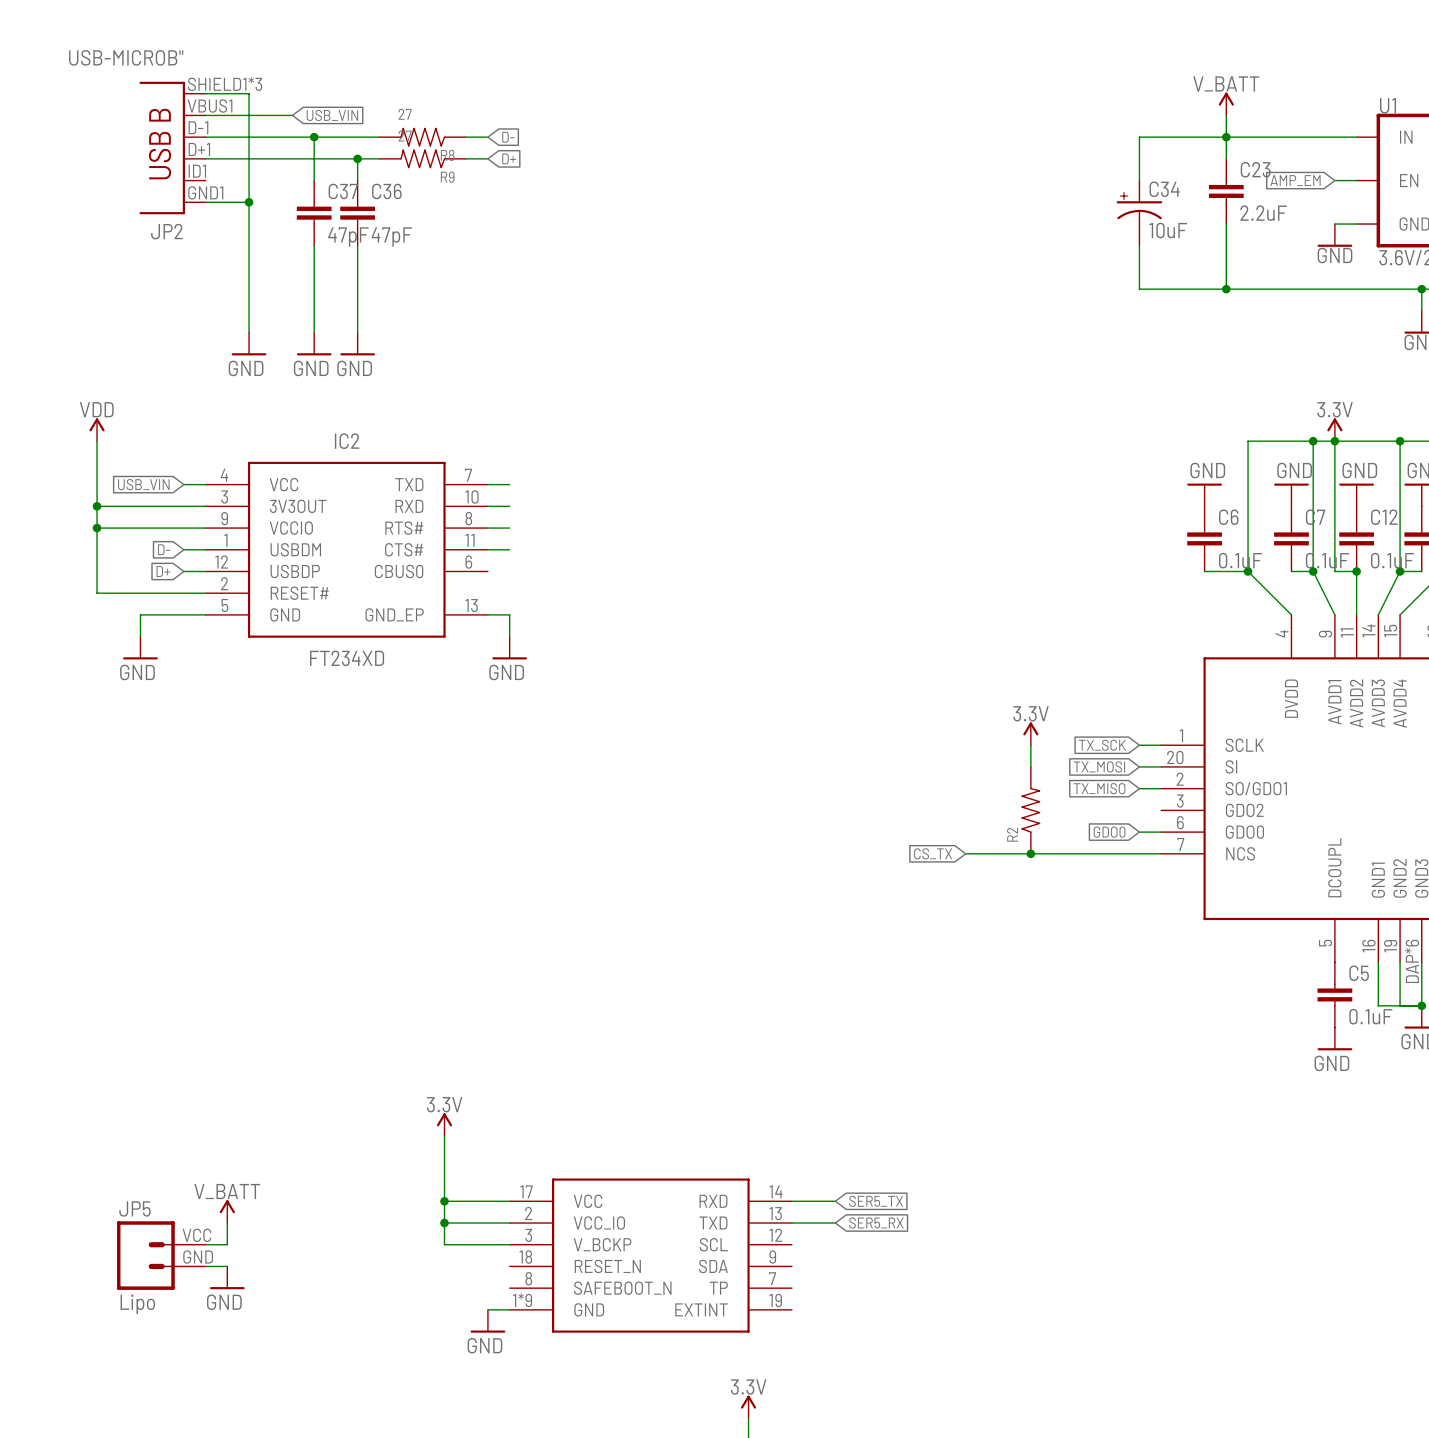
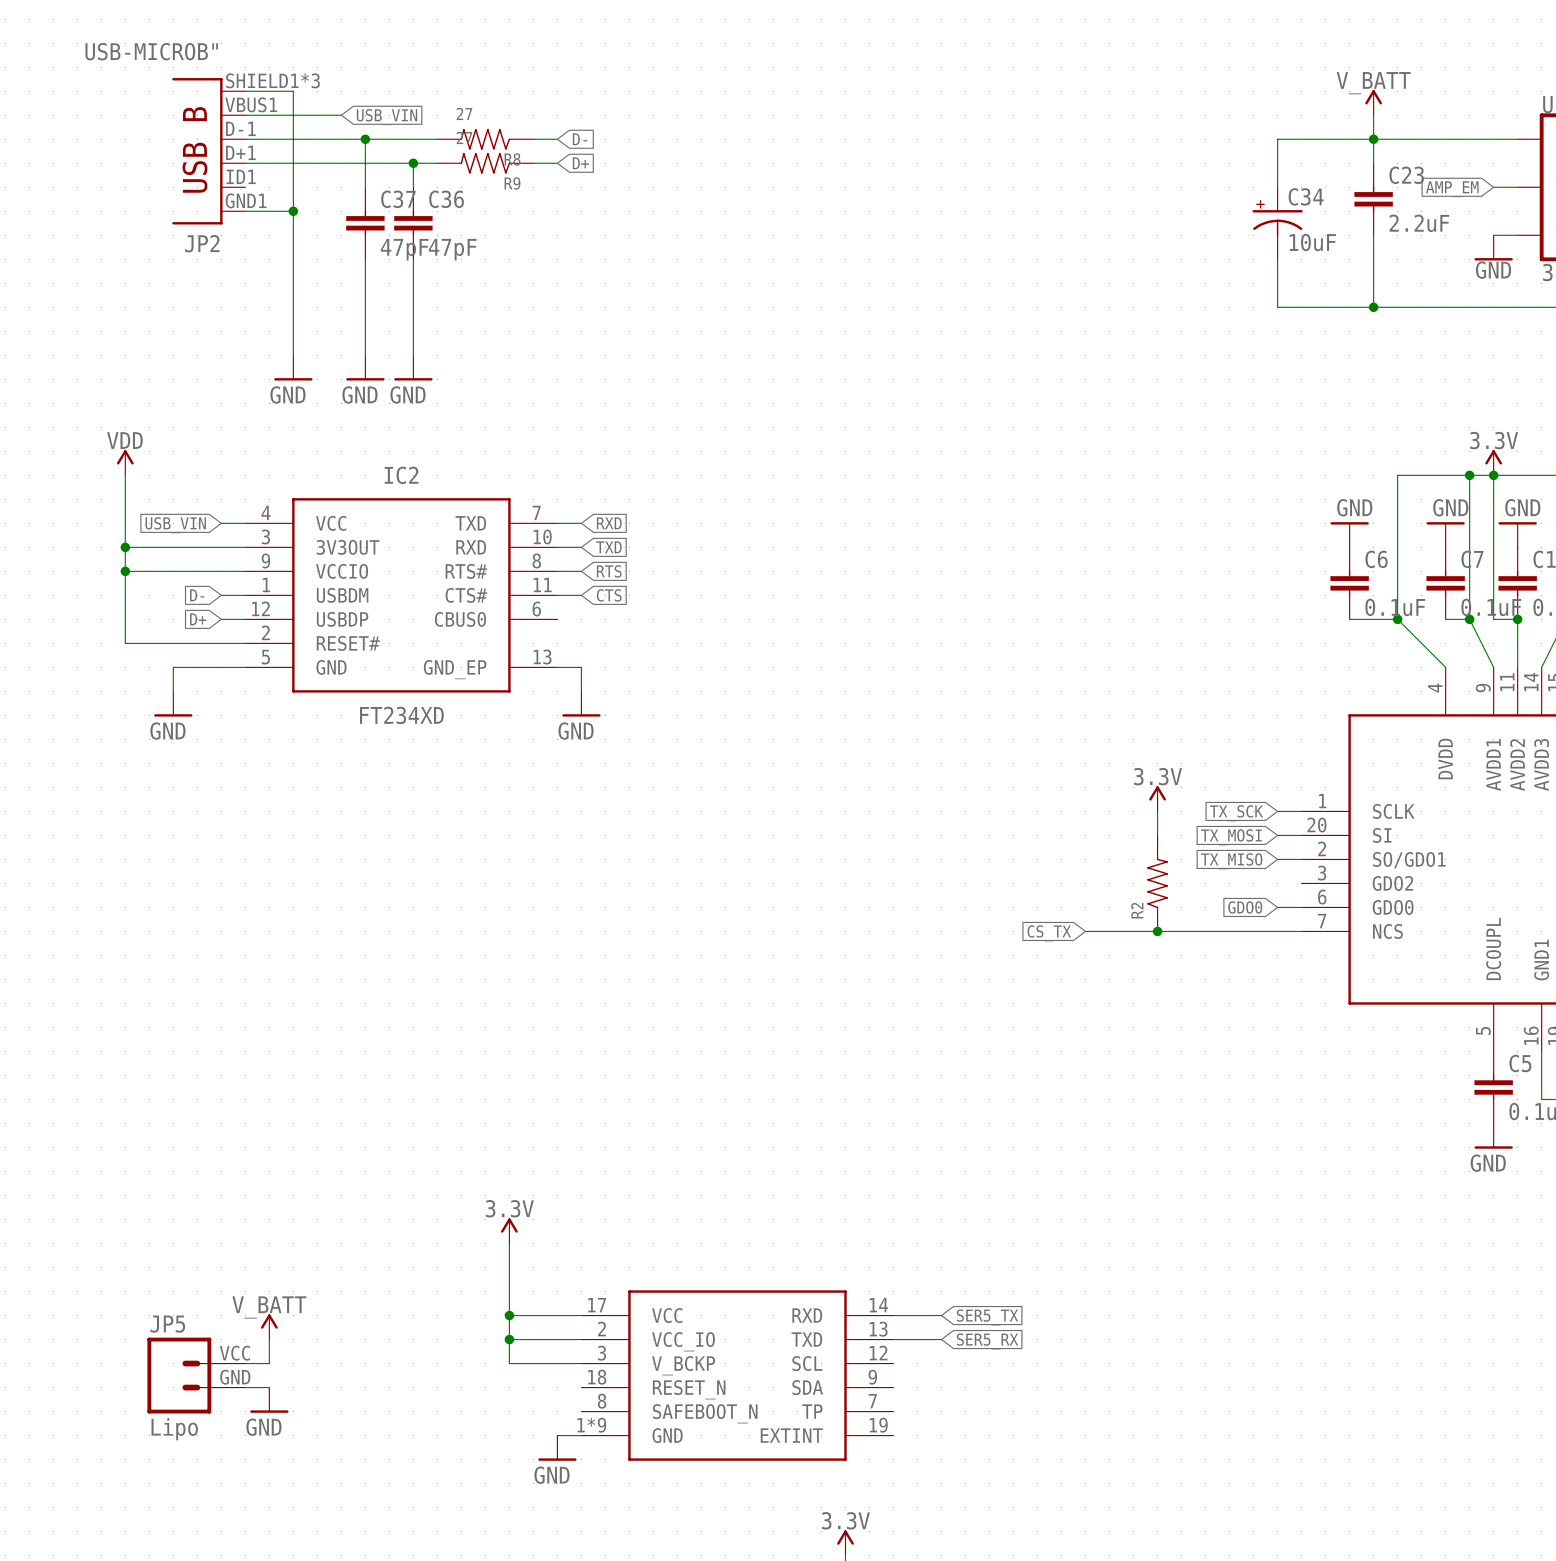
global label: none -> RXD (609, 523)
global label: none -> TXD (608, 547)
global label: none -> RTS (609, 571)
global label: none -> CTS (609, 595)

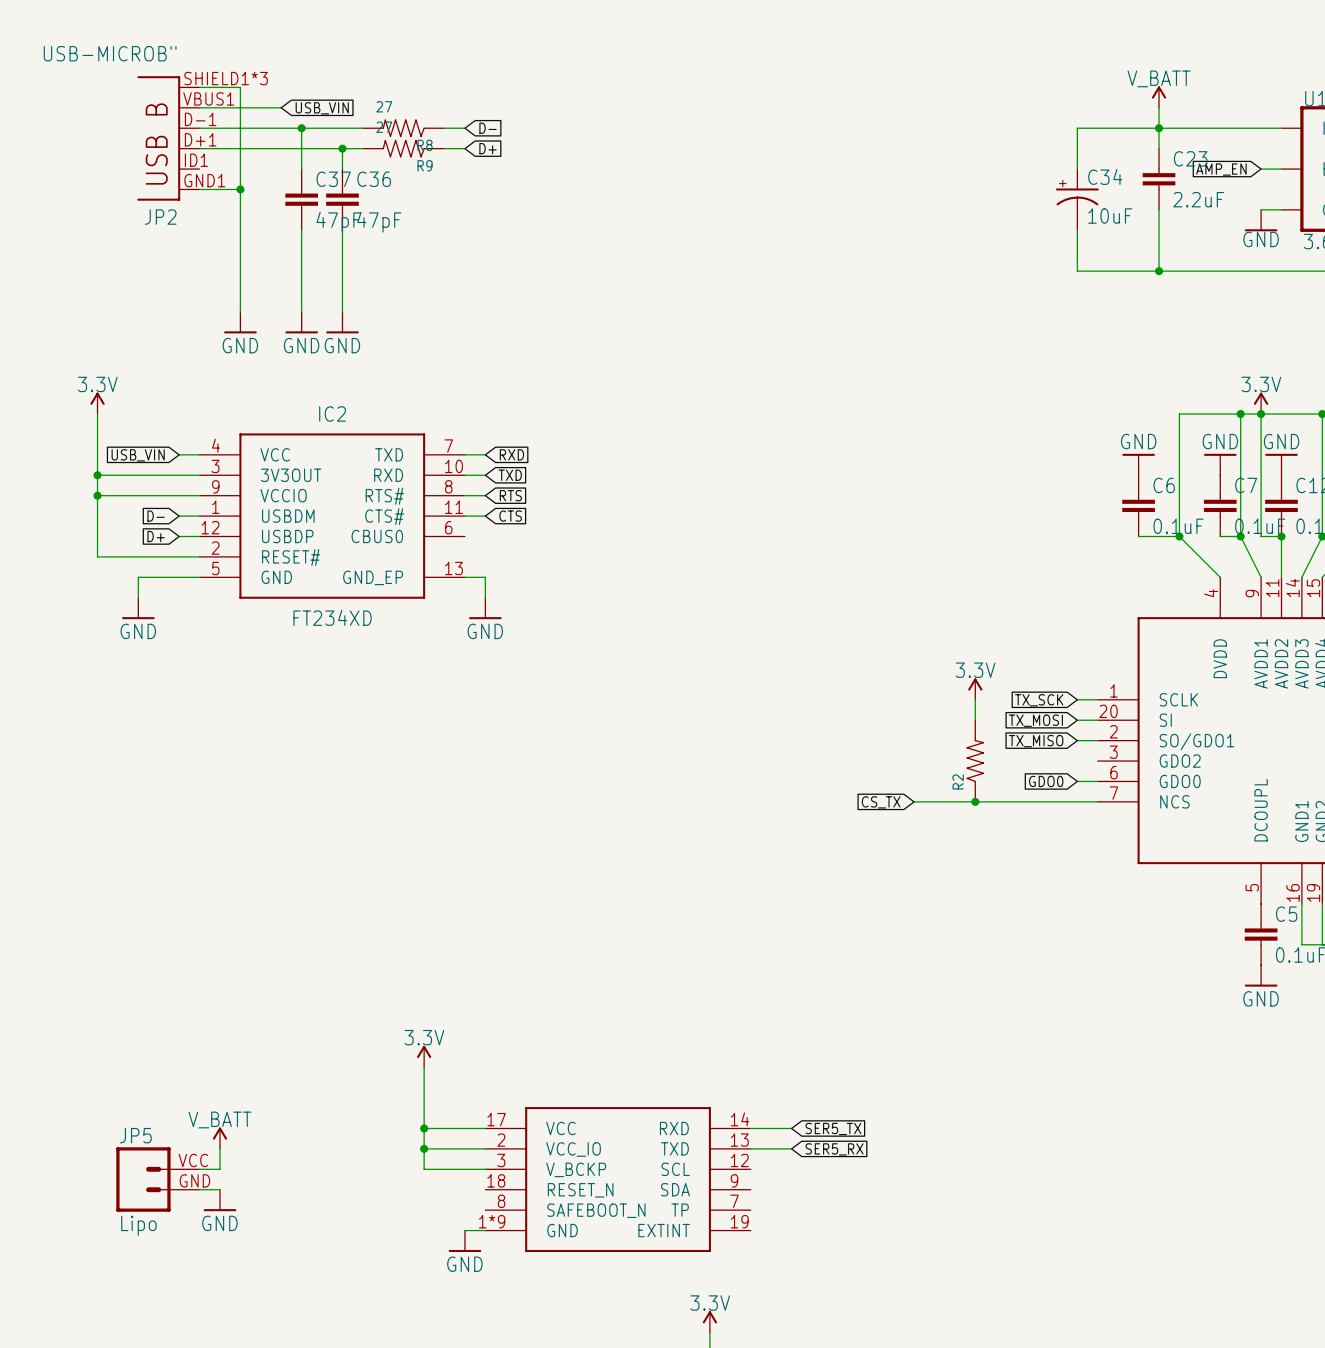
global label: AMP_EM (1452, 189) -> AMP_EN (1221, 169)
power symbol: VDD (125, 462) -> 3.3V (97, 403)

